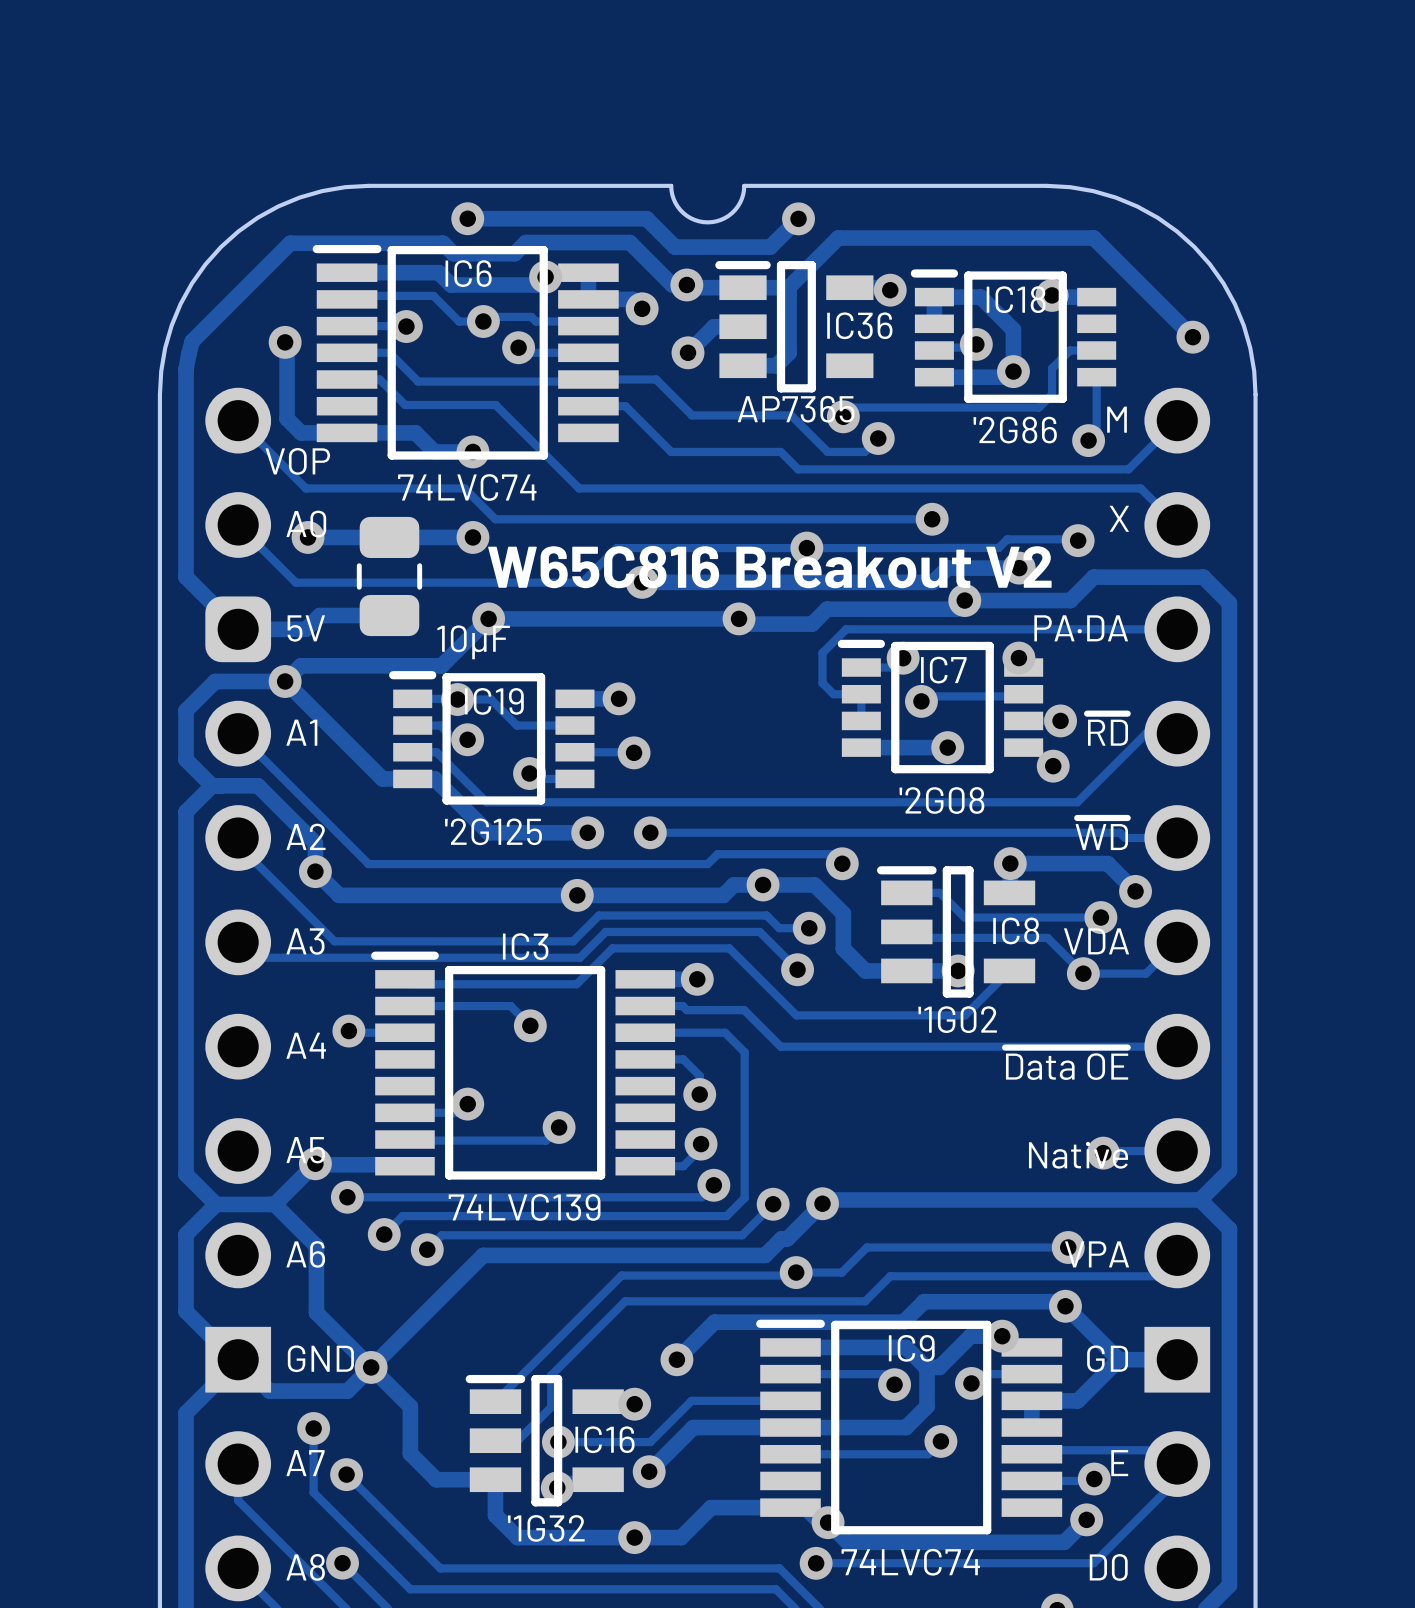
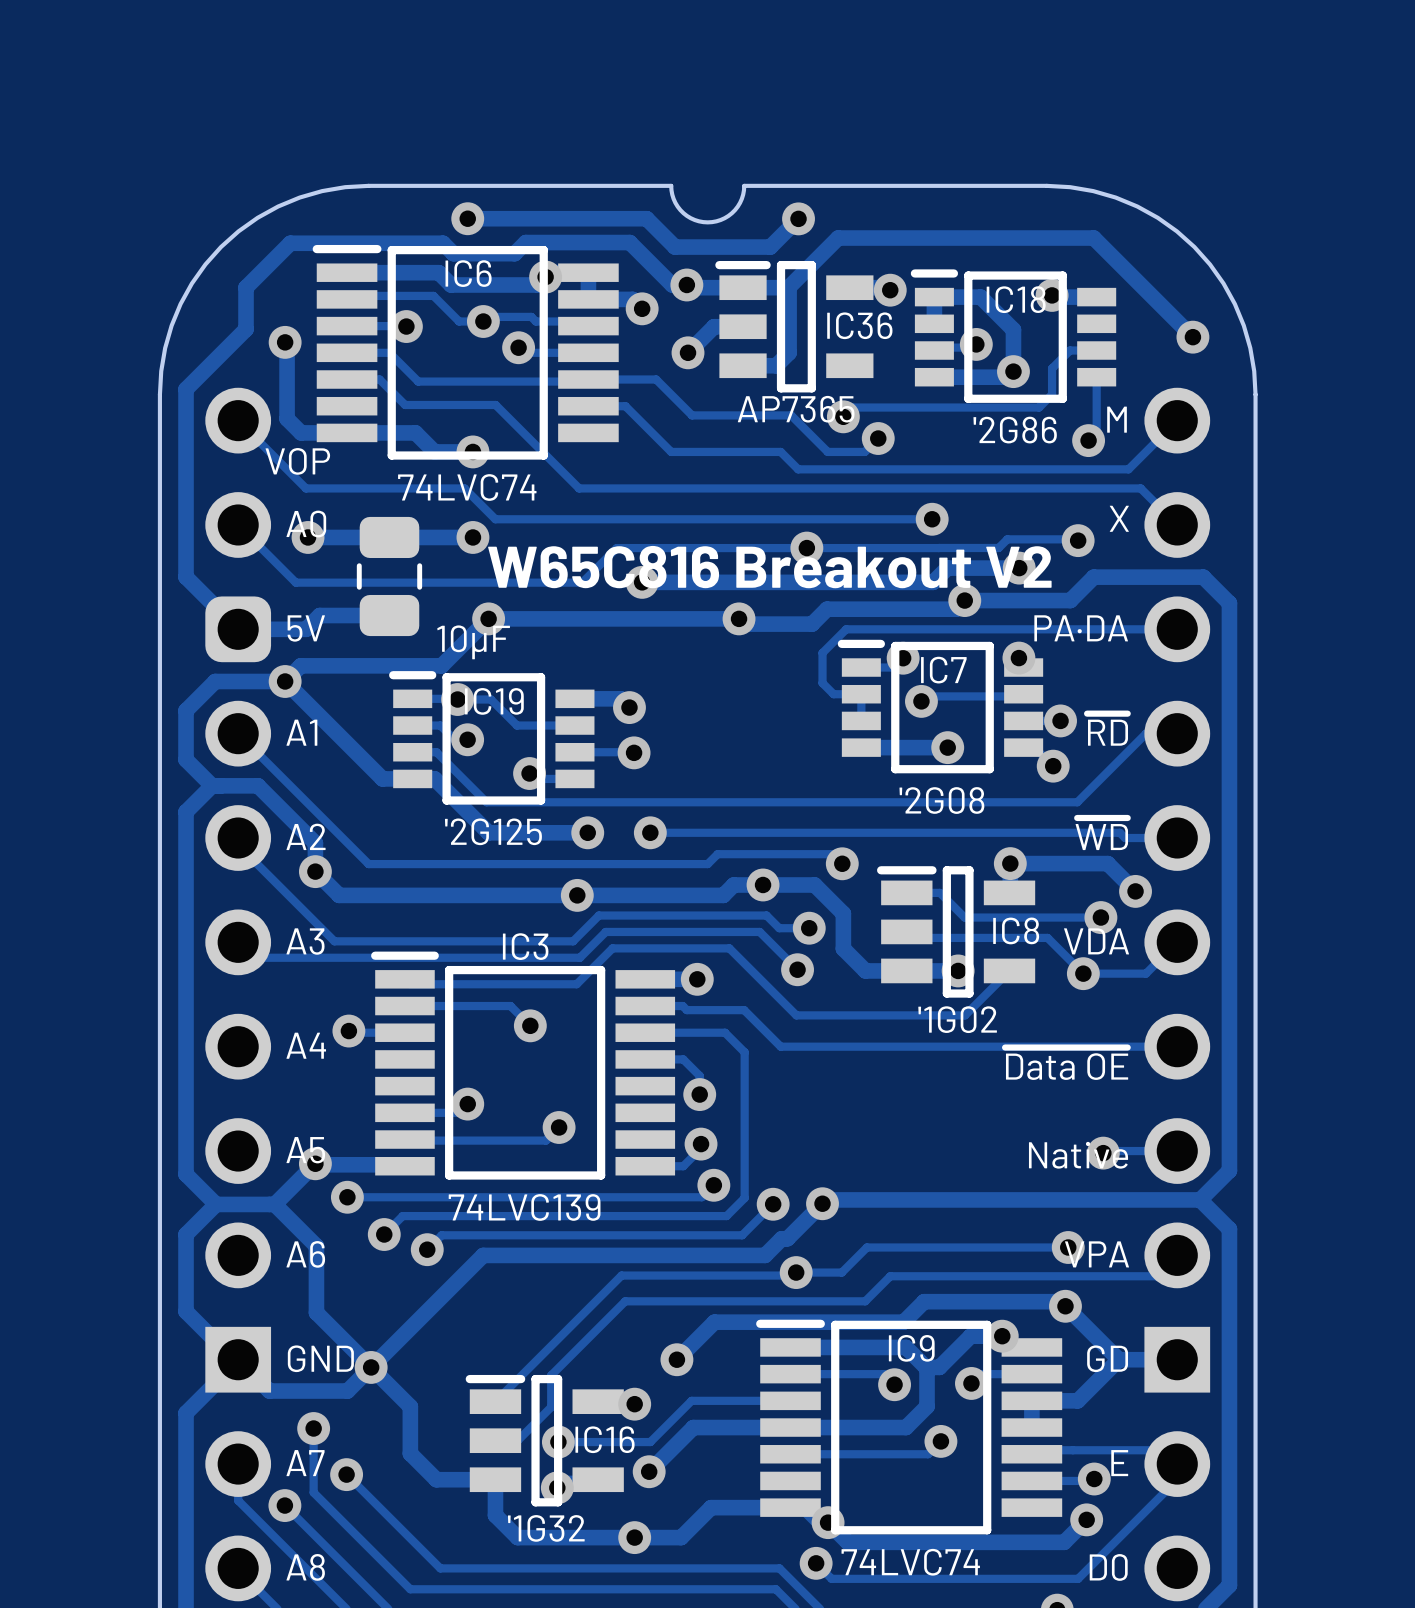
track: (246, 287) (192, 341) (186, 369) (186, 389) -> (246, 287) (246, 329) (186, 389)
via position: (619, 698) -> (629, 707)
track: none -> (284, 1505) (342, 1563)
via position: (342, 1563) -> (284, 1505)
track: (816, 1563) (1093, 1563) -> (816, 1563) (831, 1578) (1078, 1578) (1093, 1563)

